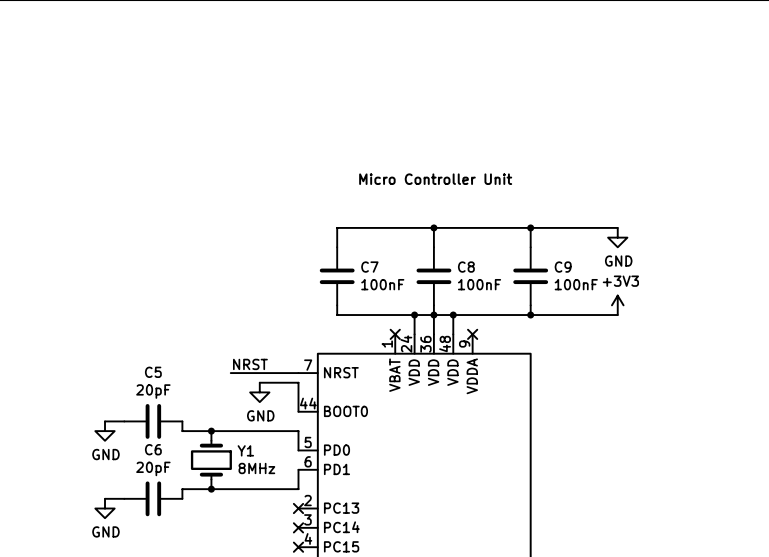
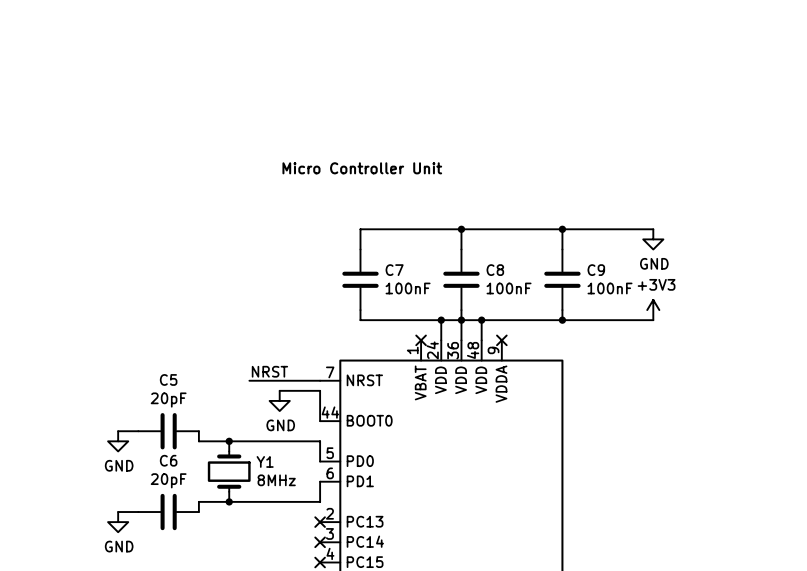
text position: Micro Controller Unit (435, 179) -> Micro Controller Unit (362, 168)

